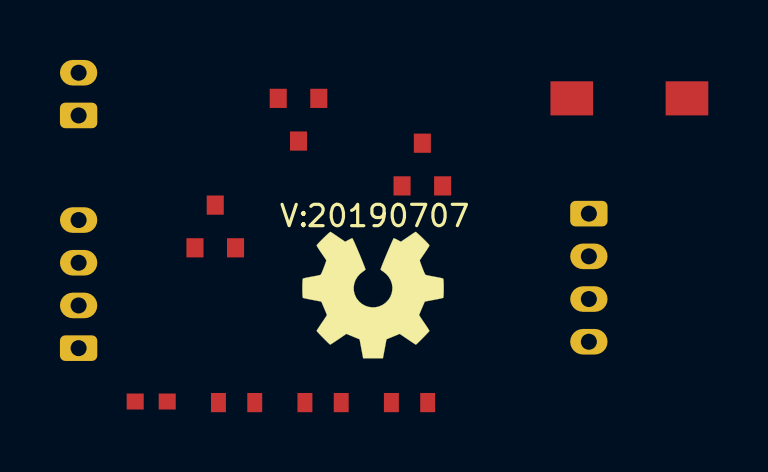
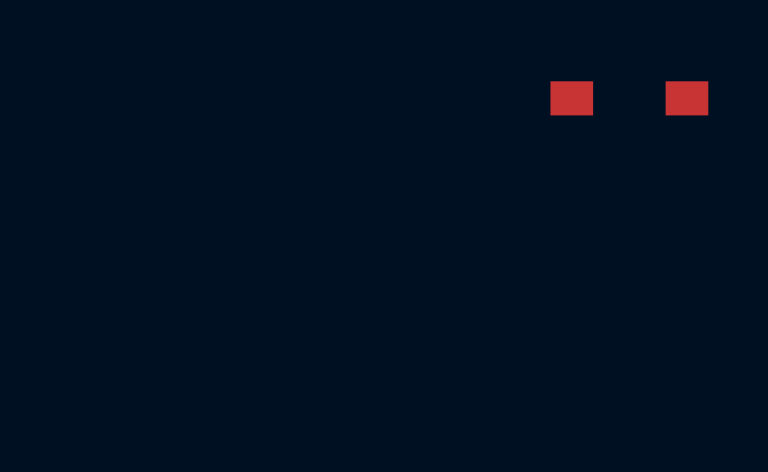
part: (78, 94) -> none
part: (298, 119) -> none
part: (422, 164) -> none
part: (215, 226) -> none
drawing: [302, 231, 444, 359] -> none
part: (588, 277) -> none
part: (78, 284) -> none
part: (151, 401) -> none
part: (236, 402) -> none
part: (323, 402) -> none
part: (409, 402) -> none

